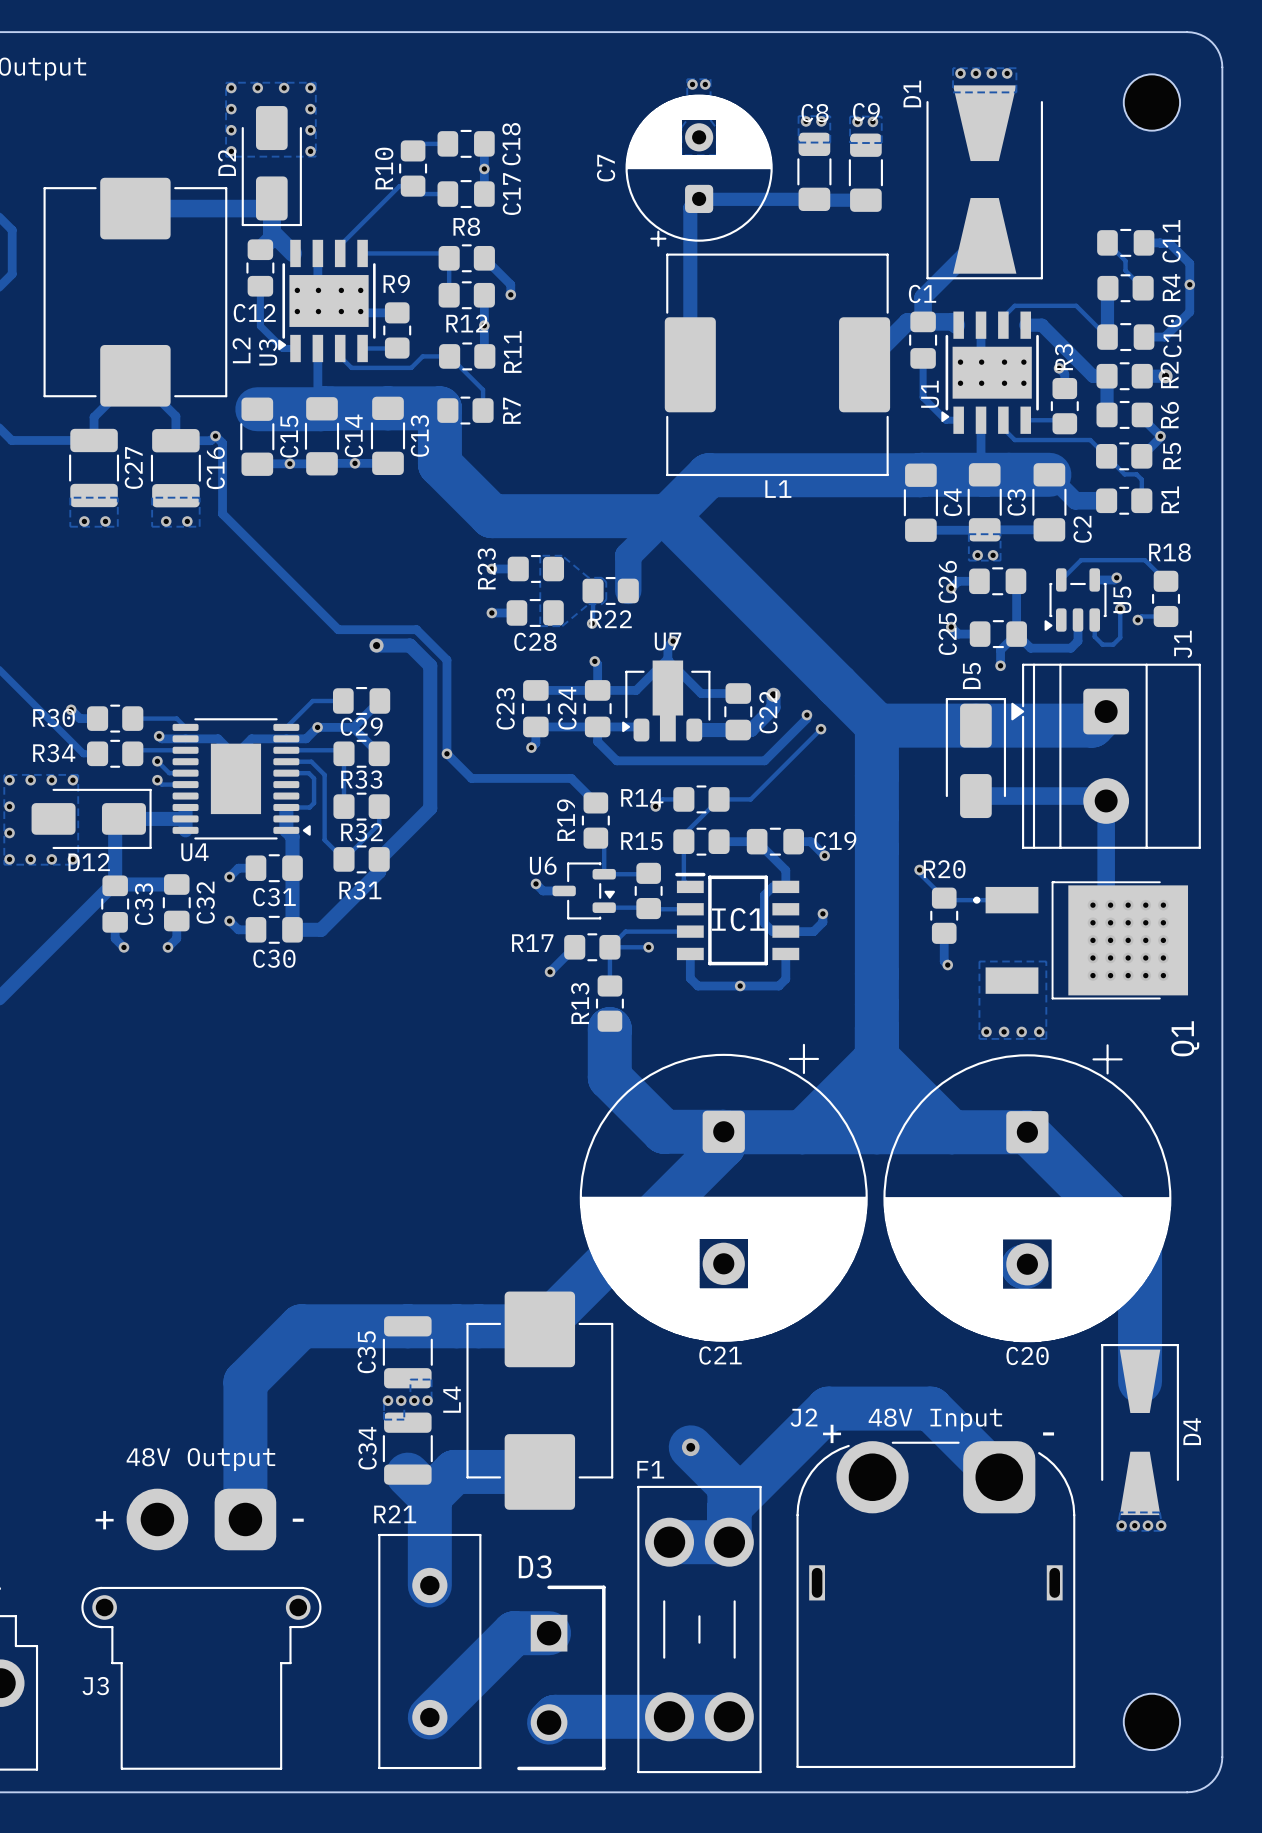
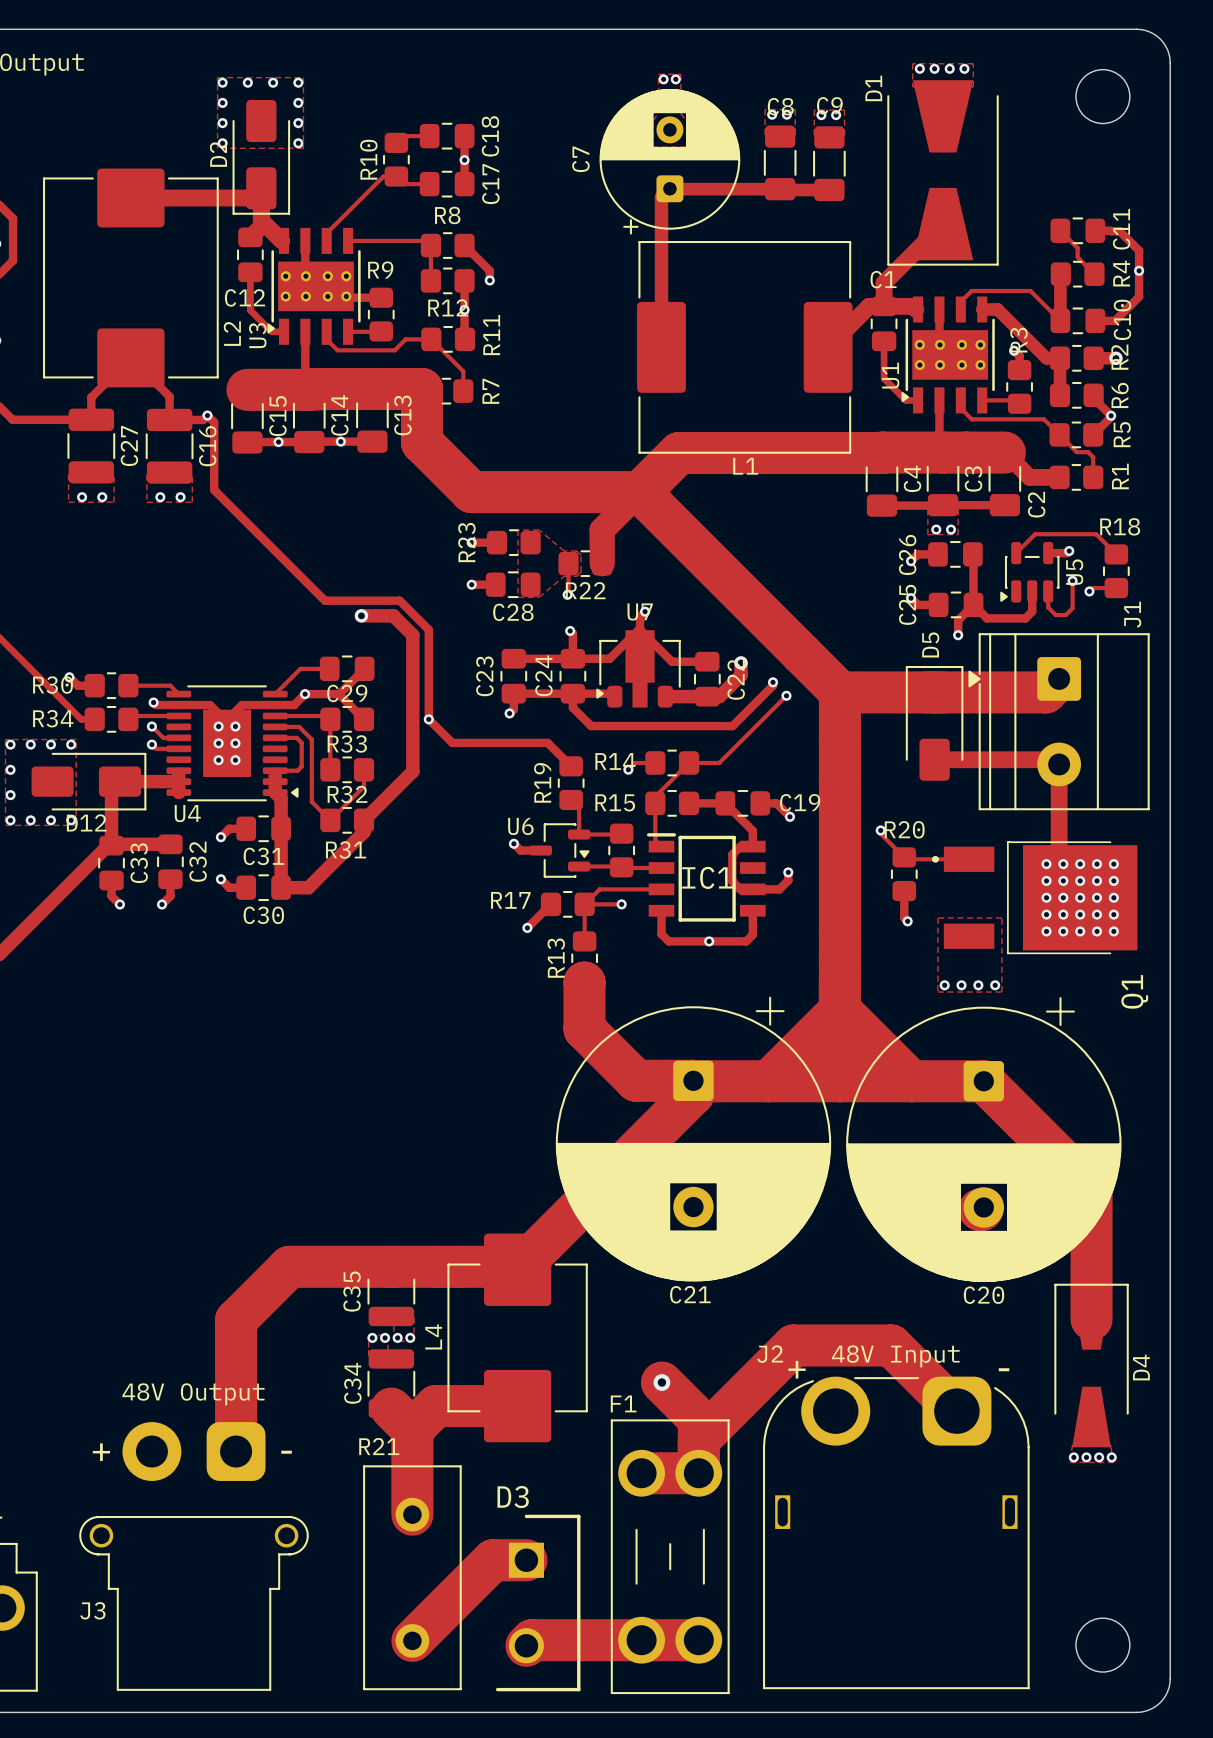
via: none -> (218, 726)
via: none -> (235, 726)
via: none -> (218, 743)
via: none -> (235, 743)
via: none -> (218, 760)
via: none -> (235, 760)

